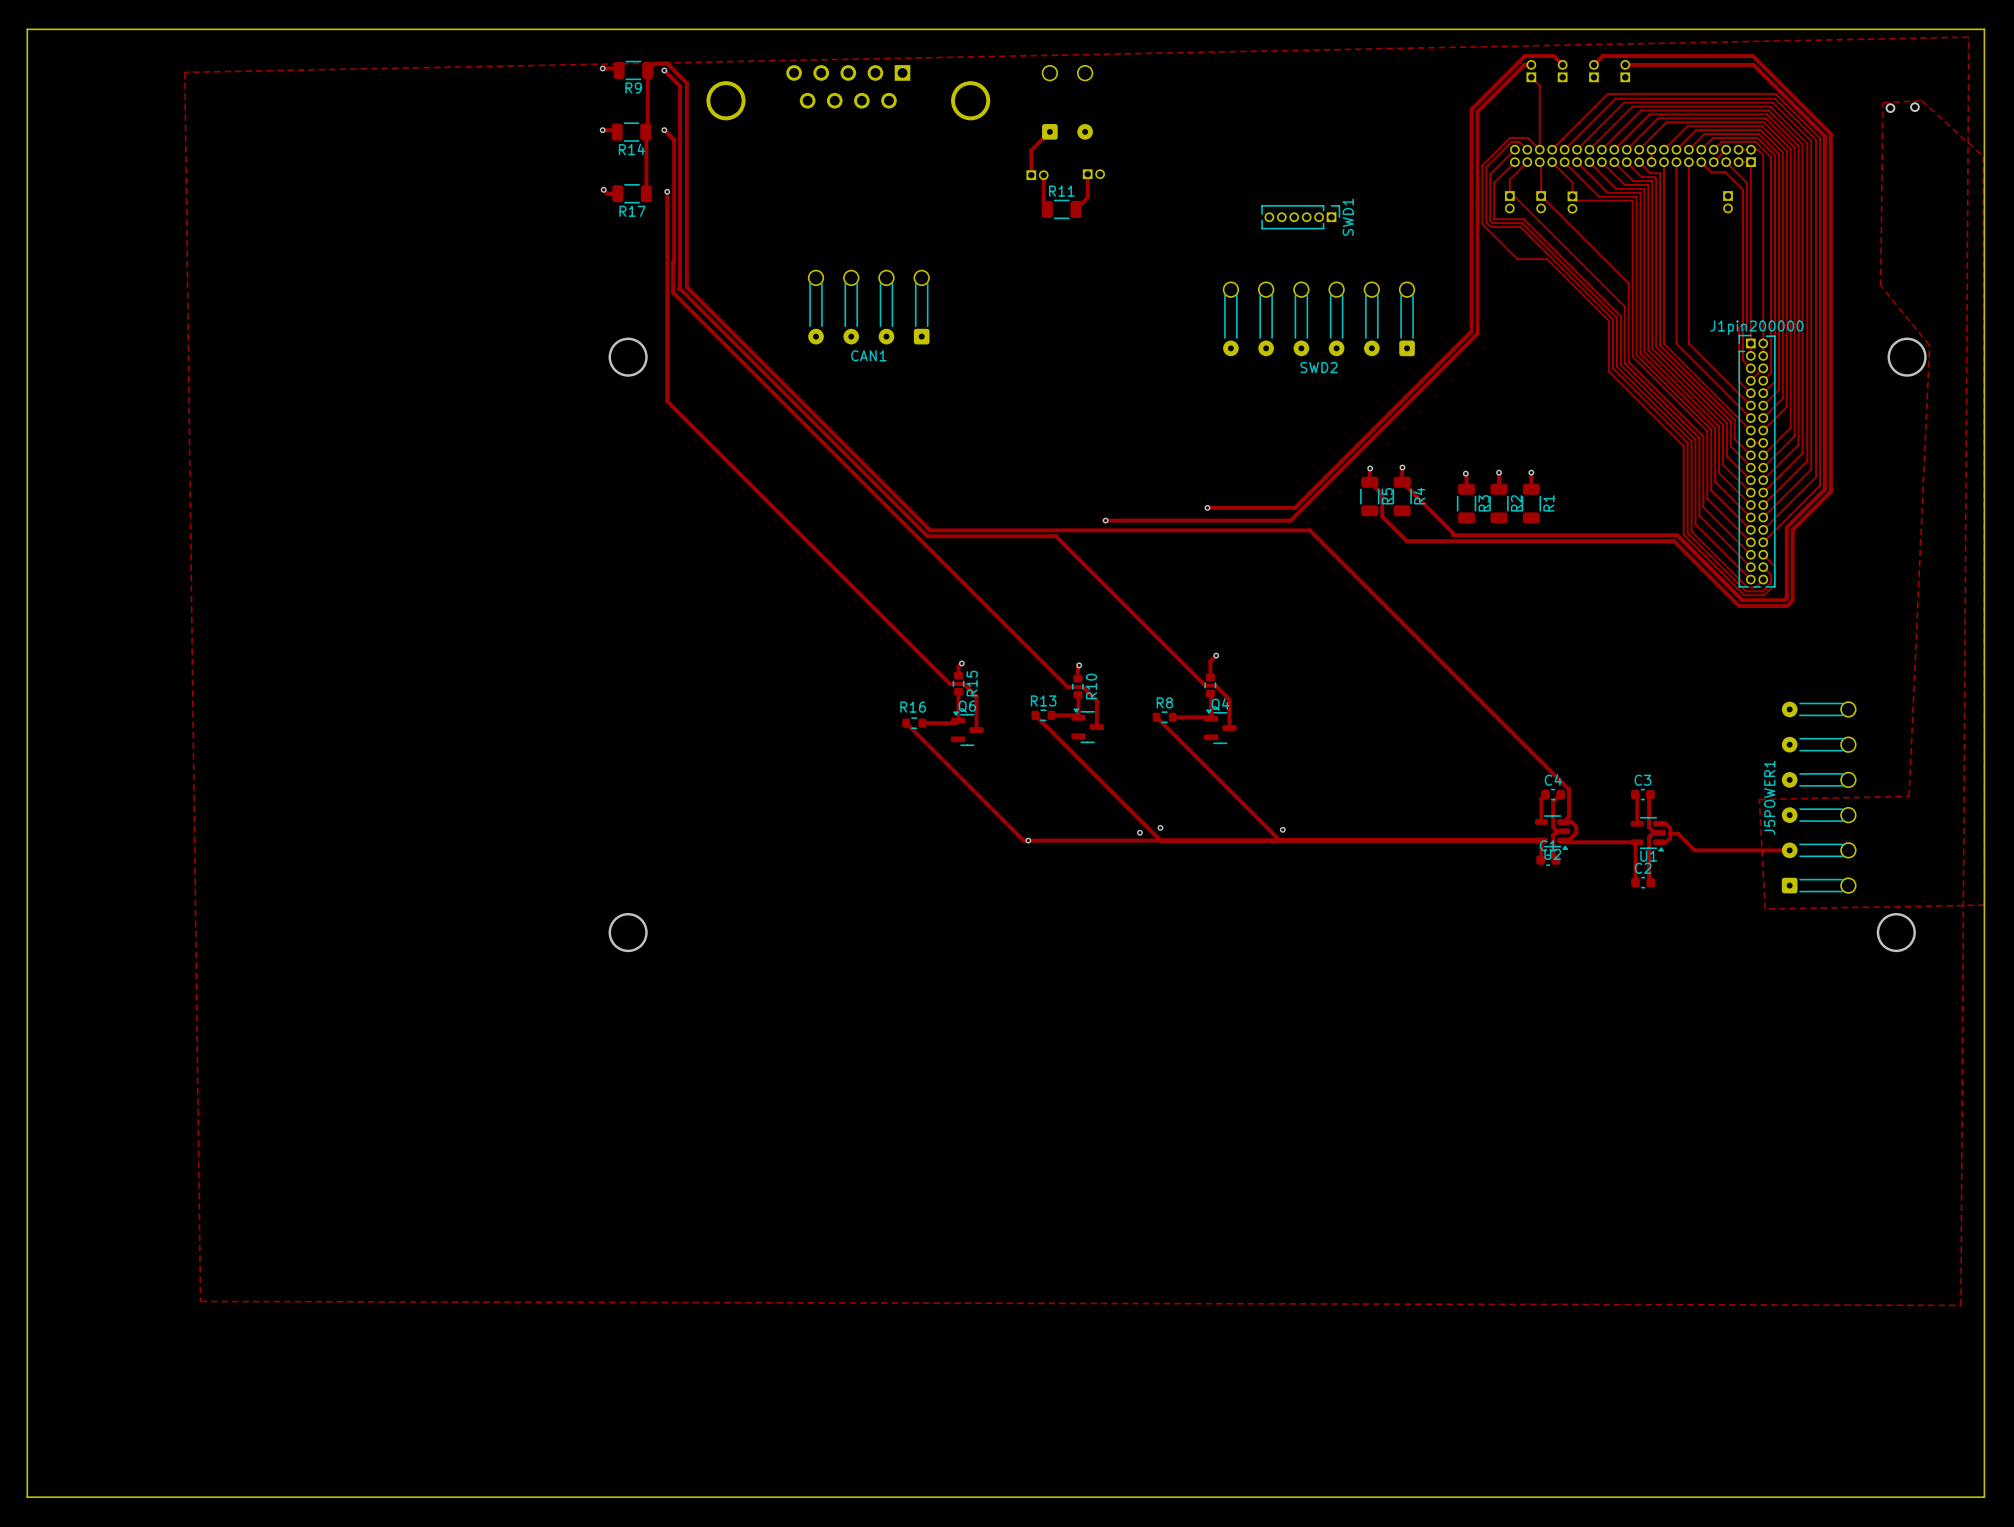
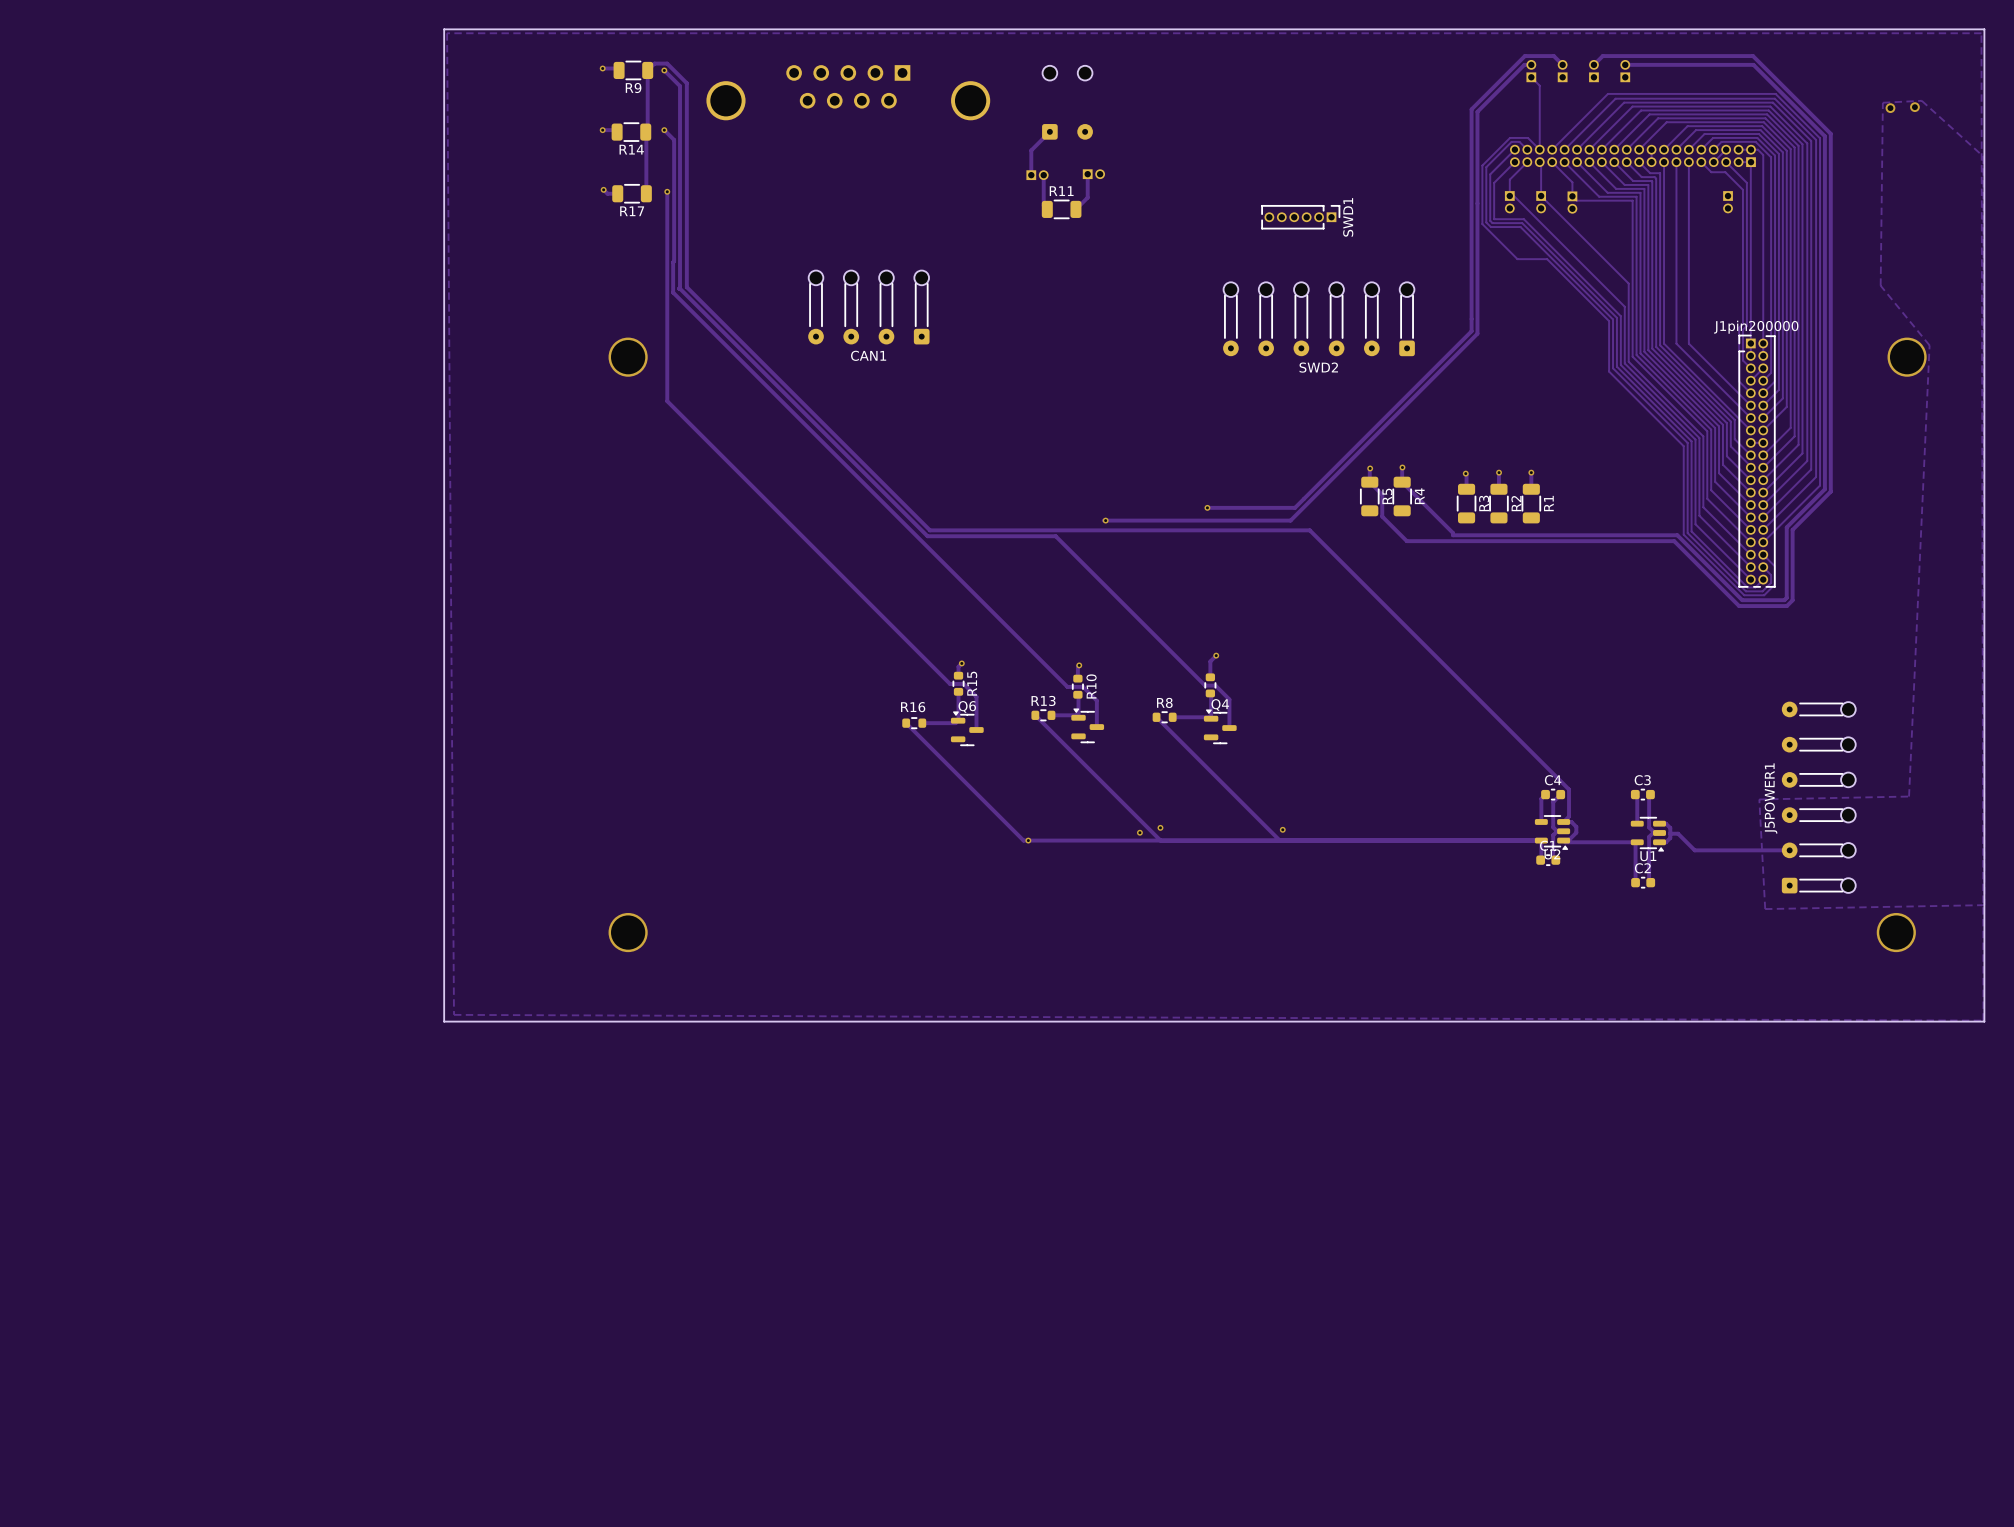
board edge: (444, 29) (27, 29) (27, 1497) (1984, 1497) (1984, 1021) -> (444, 29) (444, 1021) (1984, 1021)
zone outline: (1968, 37) (1960, 1305) (200, 1301) (184, 72) (1968, 37) -> (447, 33) (454, 1014) (1983, 1020) (1981, 33) (447, 33)

